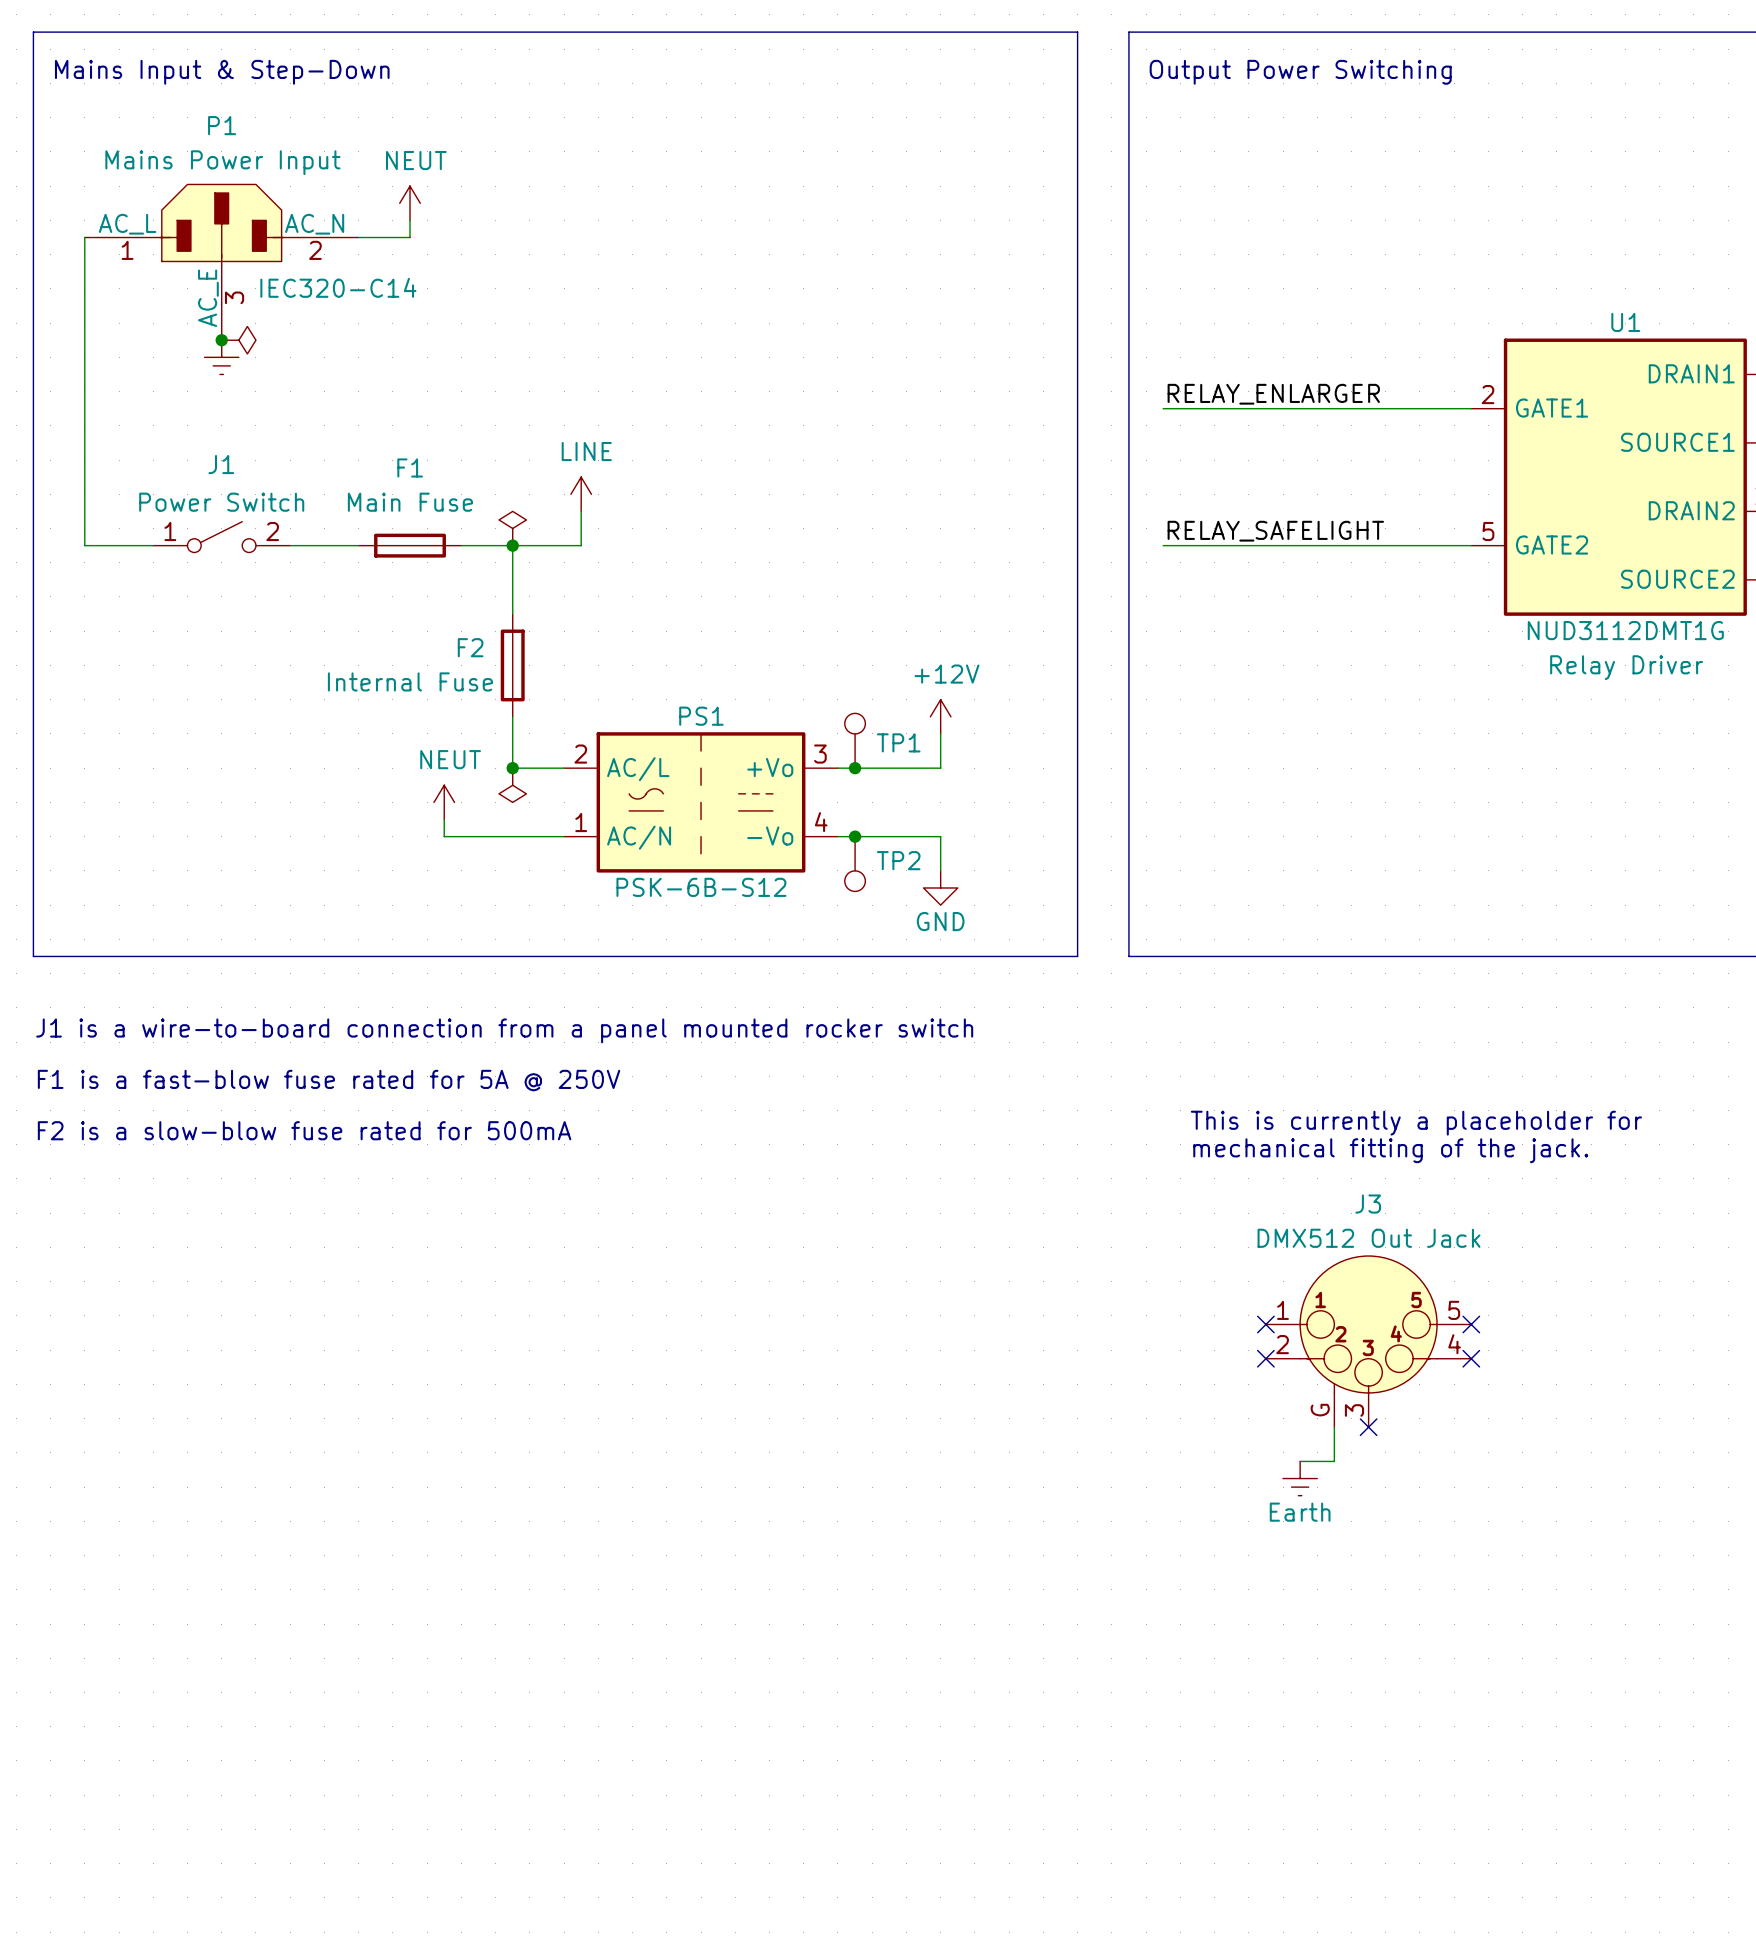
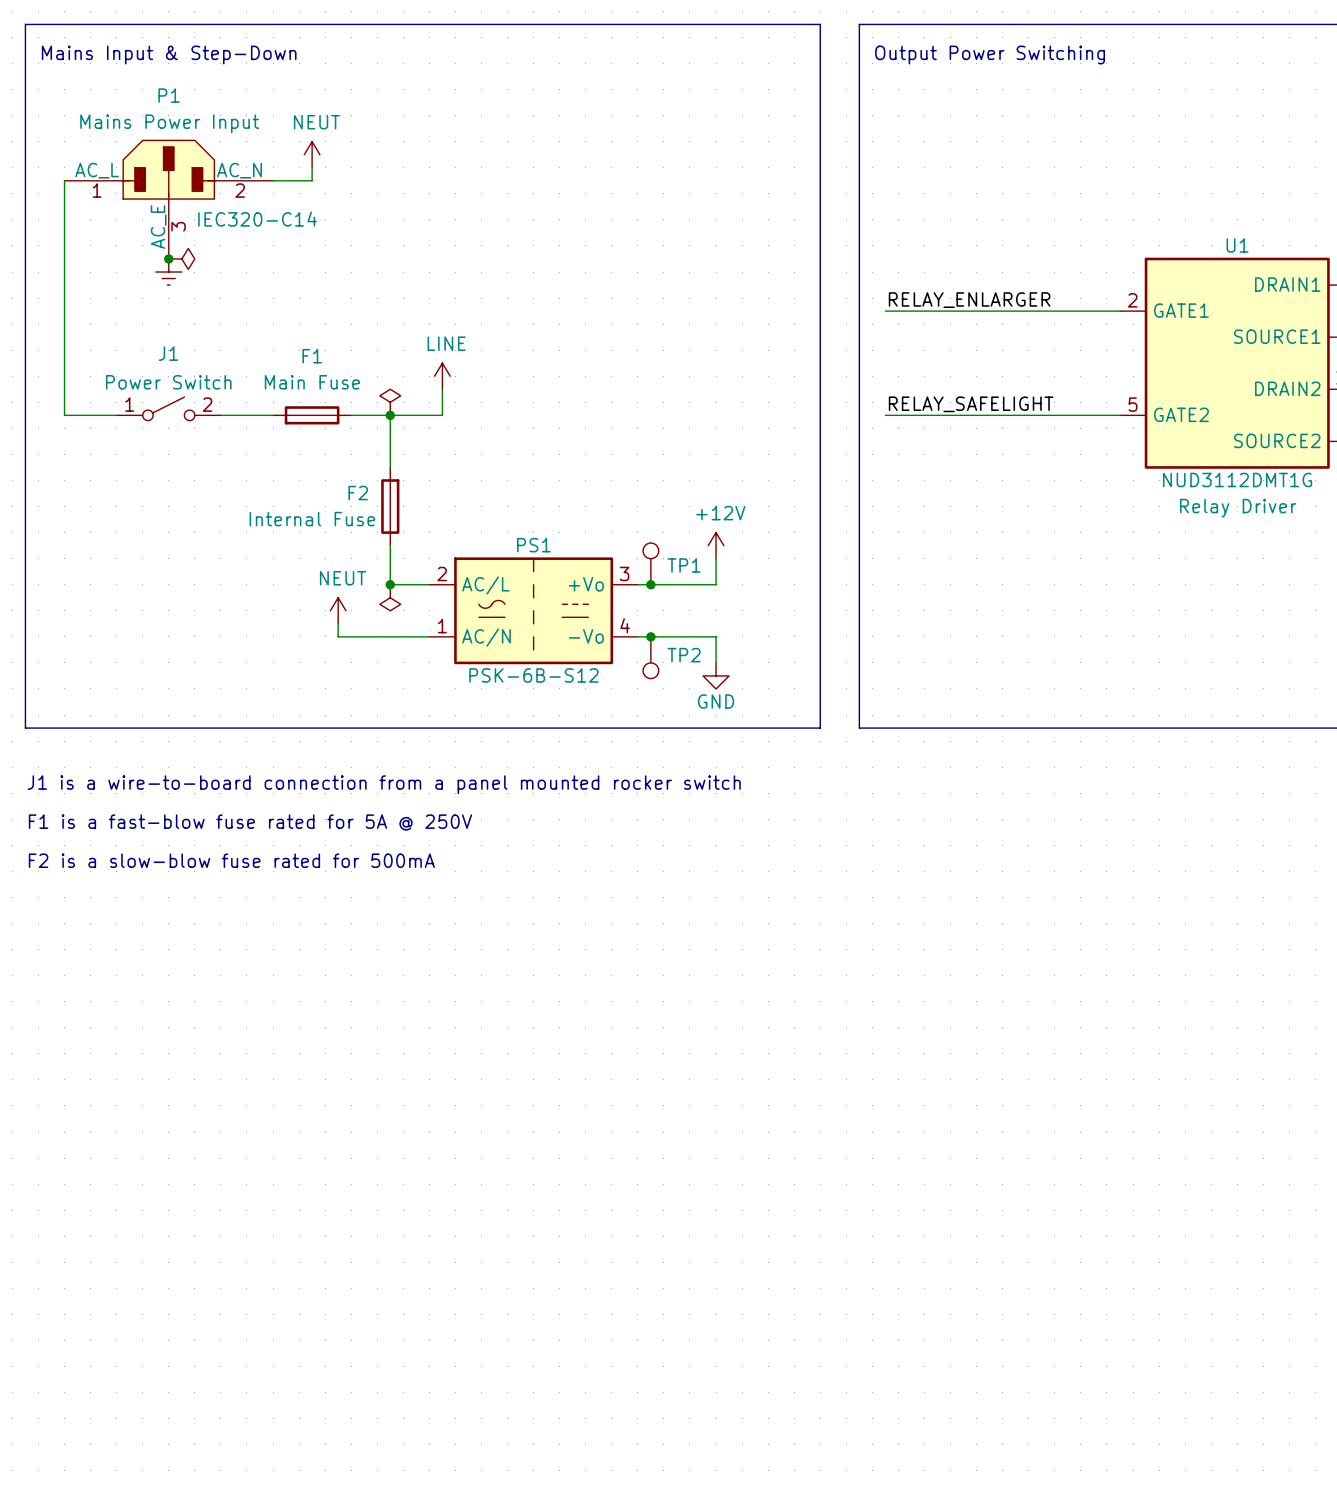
text: This is currently a placeholder for (1416, 1123) -> none
text: mechanical fitting of the jack. (1390, 1150) -> none
no-connect mark: (1265, 1324) -> none
no-connect mark: (1471, 1324) -> none
J3: DMX512 Out Jack (1368, 1341) -> none
no-connect mark: (1265, 1358) -> none
no-connect mark: (1471, 1358) -> none
wire: (1334, 1427) (1334, 1461) (1300, 1461) -> none
no-connect mark: (1368, 1427) -> none
power symbol: Earth (1300, 1478) -> none

